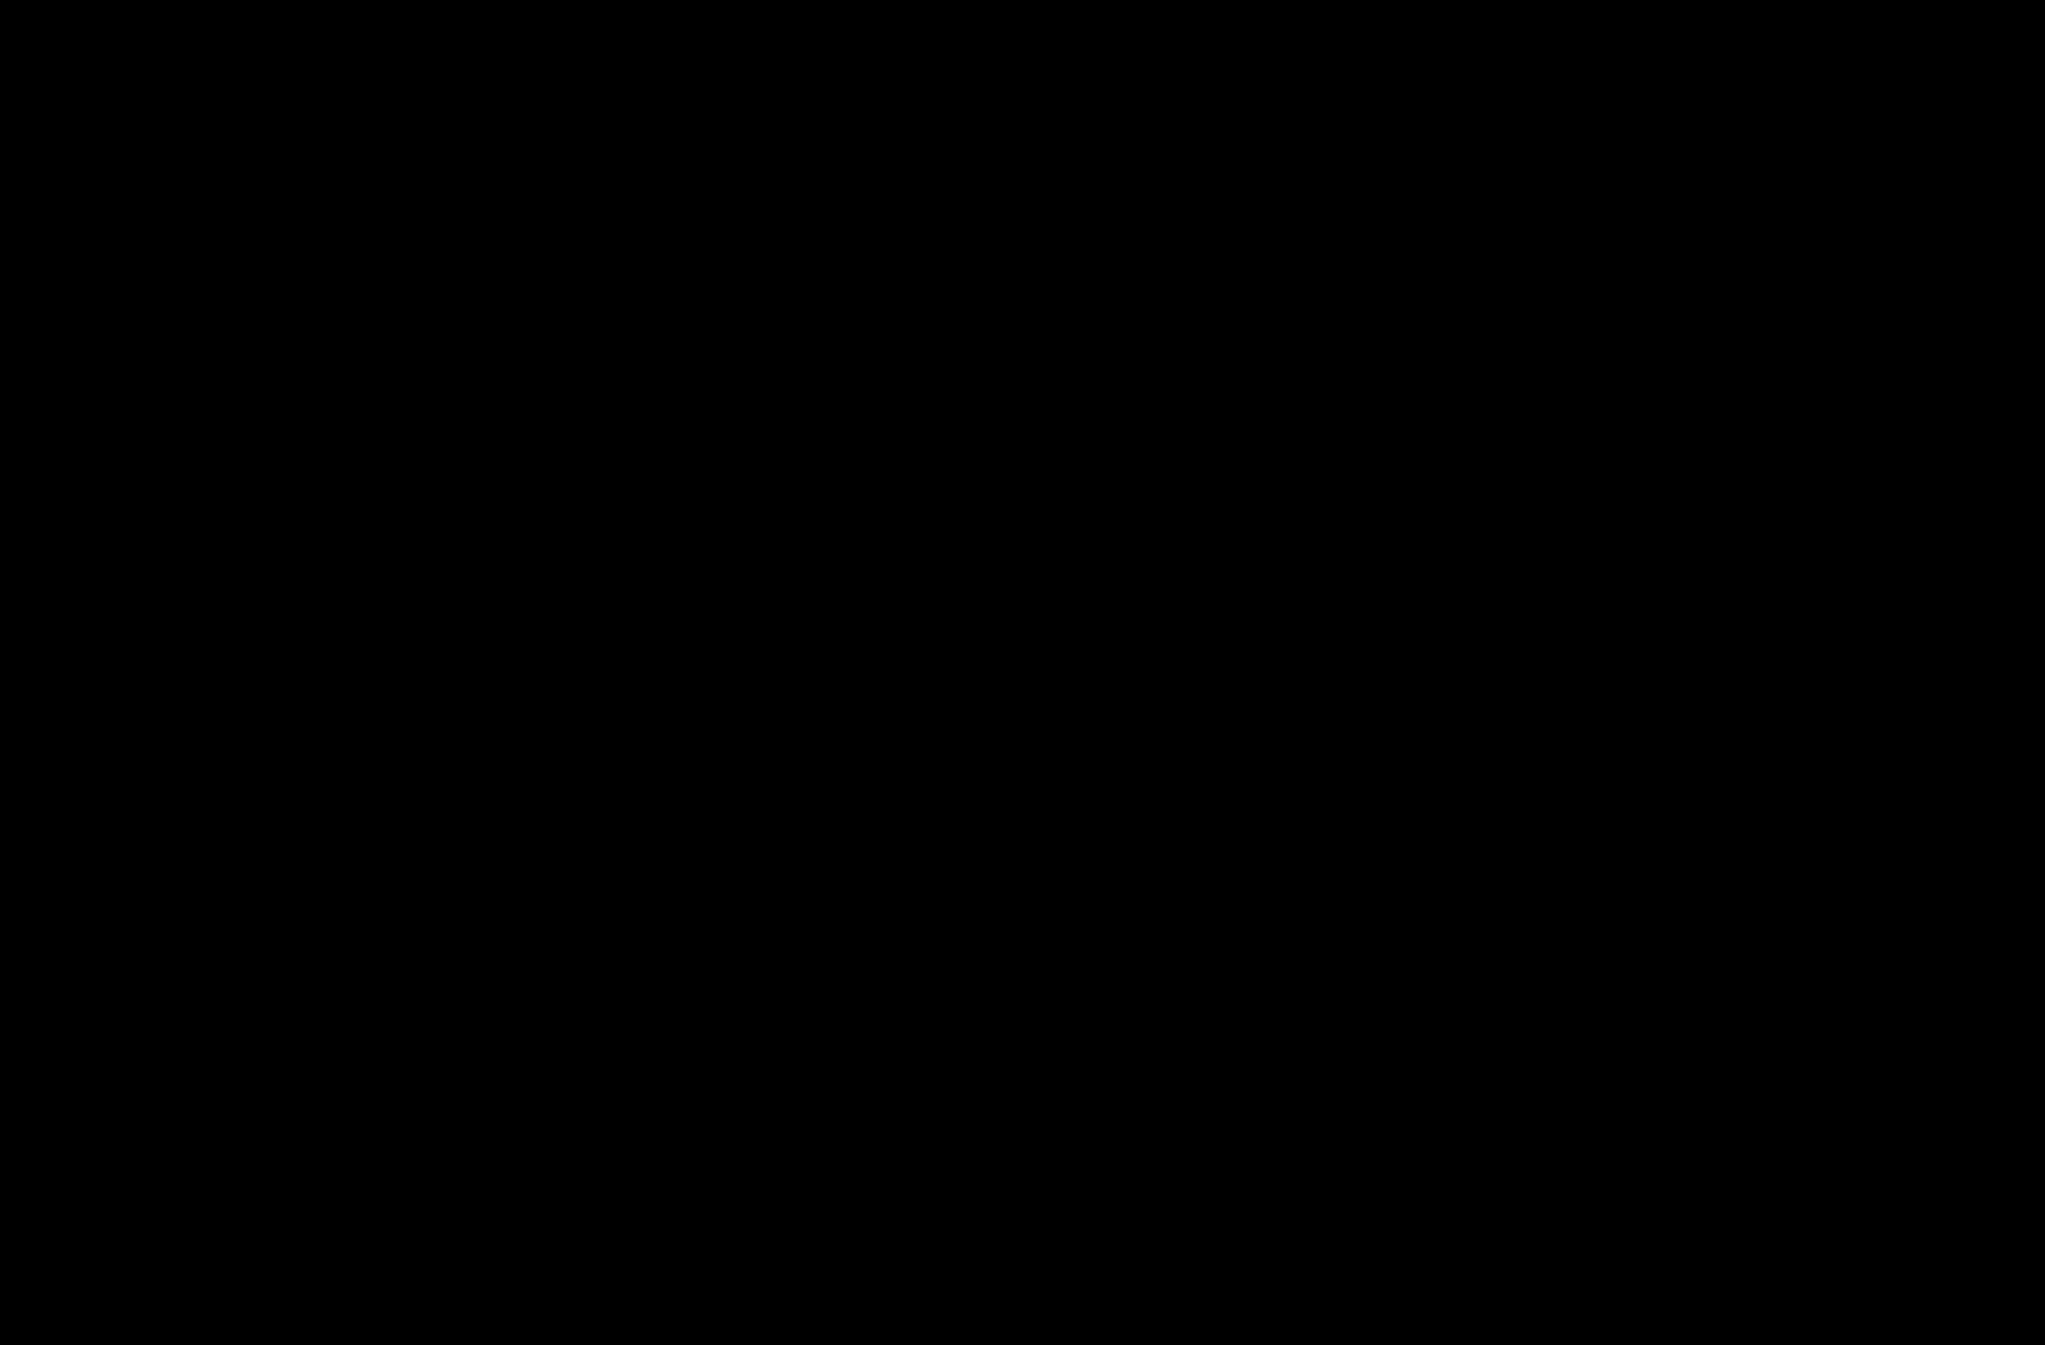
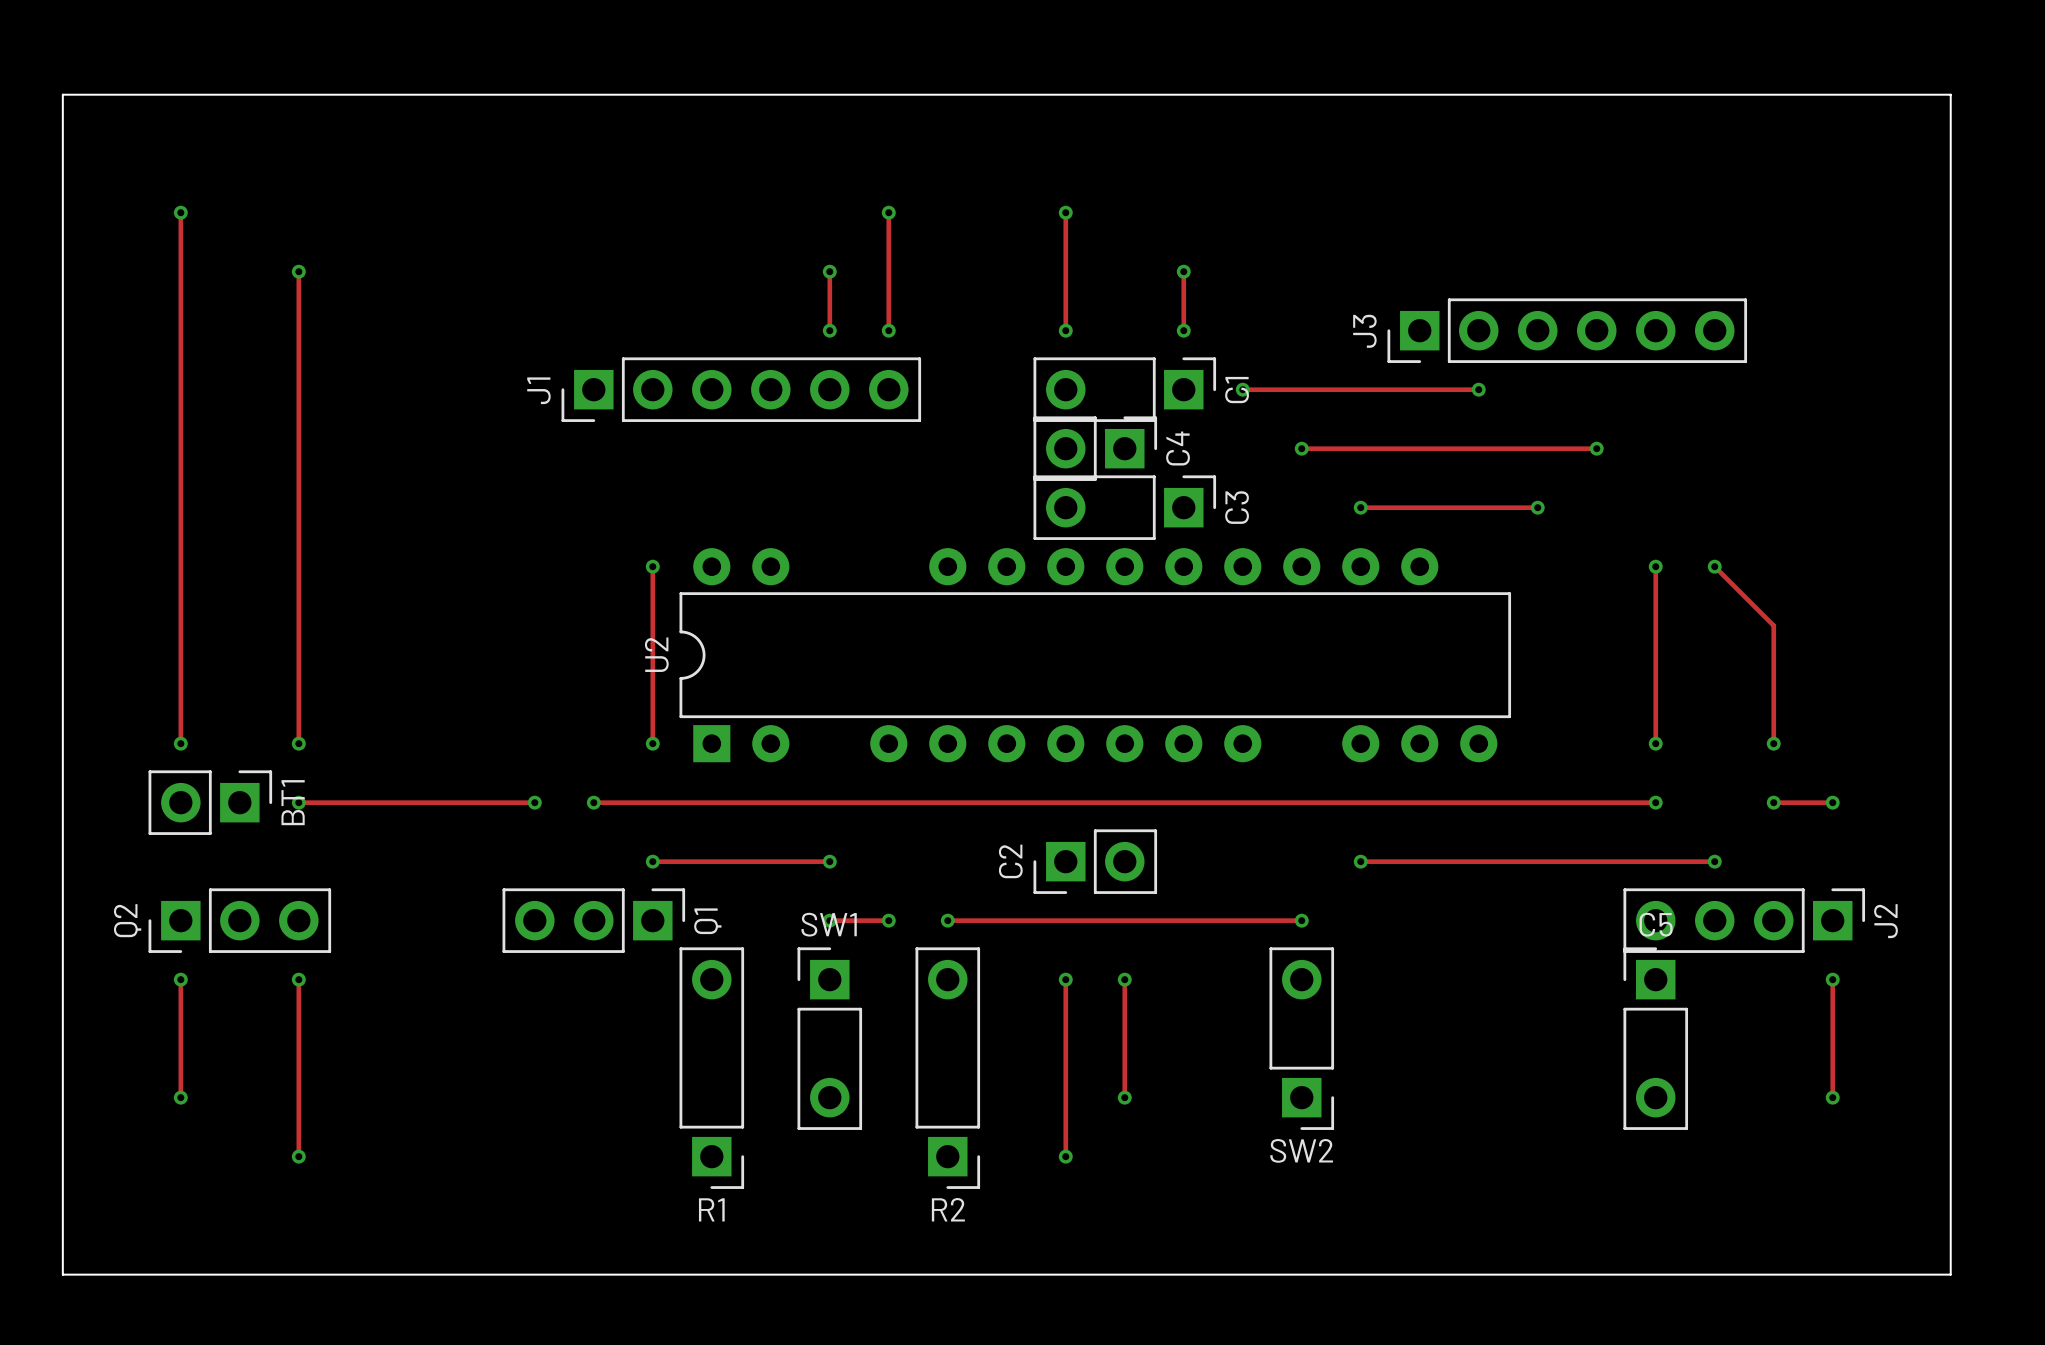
board edge: none -> (62, 94) (1950, 94) (1950, 1274) (62, 1274) (62, 94)
track: none -> (180, 212) (180, 743)
via: none -> (180, 212)
track: none -> (888, 212) (888, 330)
via: none -> (888, 212)
track: none -> (1065, 212) (1065, 330)
via: none -> (1065, 212)
track: none -> (298, 271) (298, 743)
via: none -> (298, 271)
track: none -> (829, 271) (829, 330)
via: none -> (829, 271)
track: none -> (1183, 271) (1183, 330)
via: none -> (1183, 271)
via: none -> (829, 330)
via: none -> (888, 330)
via: none -> (1065, 330)
via: none -> (1183, 330)
J3: none -> (1567, 330)
J1: none -> (741, 389)
C1: none -> (1124, 389)
track: none -> (1242, 389) (1478, 389)
via: none -> (1242, 389)
via: none -> (1478, 389)
C4: none -> (1095, 448)
track: none -> (1301, 448) (1596, 448)
via: none -> (1301, 448)
via: none -> (1596, 448)
C3: none -> (1124, 507)
track: none -> (1360, 507) (1537, 507)
via: none -> (1360, 507)
via: none -> (1537, 507)
track: none -> (652, 566) (652, 743)
via: none -> (652, 566)
track: none -> (1655, 566) (1655, 743)
via: none -> (1655, 566)
track: none -> (1714, 566) (1773, 625) (1773, 743)
via: none -> (1714, 566)
U2: none -> (1095, 655)
via: none -> (180, 743)
via: none -> (298, 743)
via: none -> (652, 743)
via: none -> (1655, 743)
via: none -> (1773, 743)
BT1: none -> (210, 802)
track: none -> (298, 802) (534, 802)
via: none -> (298, 802)
via: none -> (534, 802)
track: none -> (593, 802) (1655, 802)
via: none -> (593, 802)
via: none -> (1655, 802)
track: none -> (1773, 802) (1832, 802)
via: none -> (1773, 802)
via: none -> (1832, 802)
track: none -> (652, 861) (829, 861)
via: none -> (652, 861)
via: none -> (829, 861)
C2: none -> (1095, 861)
track: none -> (1360, 861) (1714, 861)
via: none -> (1360, 861)
via: none -> (1714, 861)
Q2: none -> (239, 920)
Q1: none -> (593, 920)
track: none -> (829, 920) (888, 920)
via: none -> (829, 920)
via: none -> (888, 920)
track: none -> (947, 920) (1301, 920)
via: none -> (947, 920)
via: none -> (1301, 920)
J2: none -> (1744, 920)
track: none -> (180, 979) (180, 1097)
via: none -> (180, 979)
track: none -> (298, 979) (298, 1156)
via: none -> (298, 979)
track: none -> (1065, 979) (1065, 1156)
via: none -> (1065, 979)
track: none -> (1124, 979) (1124, 1097)
via: none -> (1124, 979)
track: none -> (1832, 979) (1832, 1097)
via: none -> (1832, 979)
SW1: none -> (829, 1038)
SW2: none -> (1301, 1038)
C5: none -> (1655, 1038)
R1: none -> (711, 1068)
R2: none -> (947, 1068)
via: none -> (180, 1097)
via: none -> (1124, 1097)
via: none -> (1832, 1097)
via: none -> (298, 1156)
via: none -> (1065, 1156)

